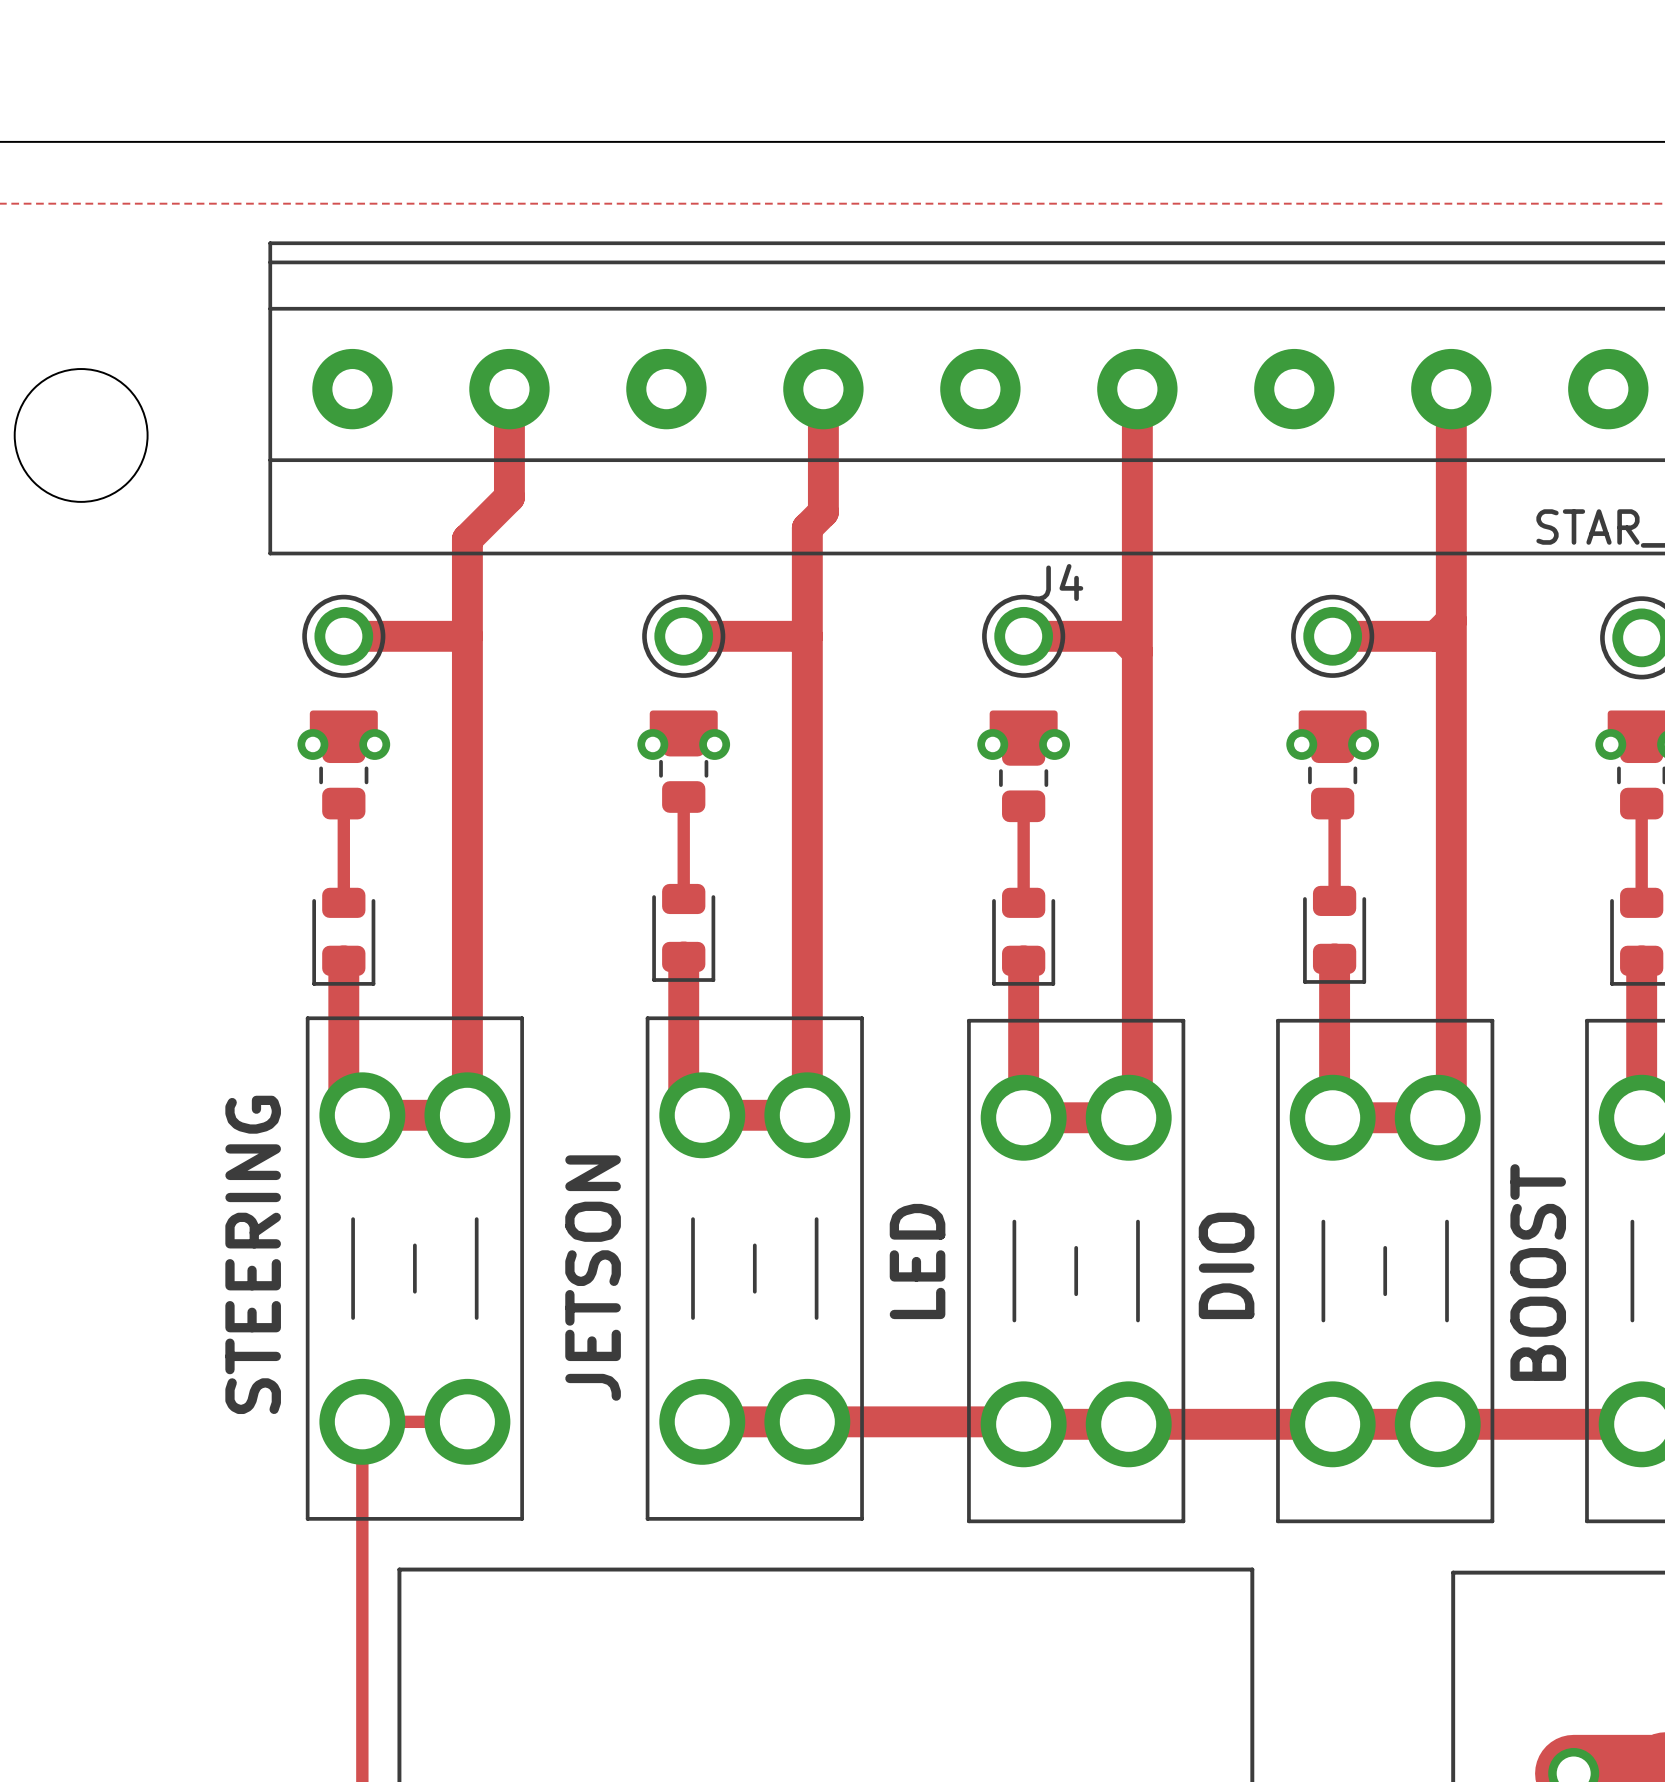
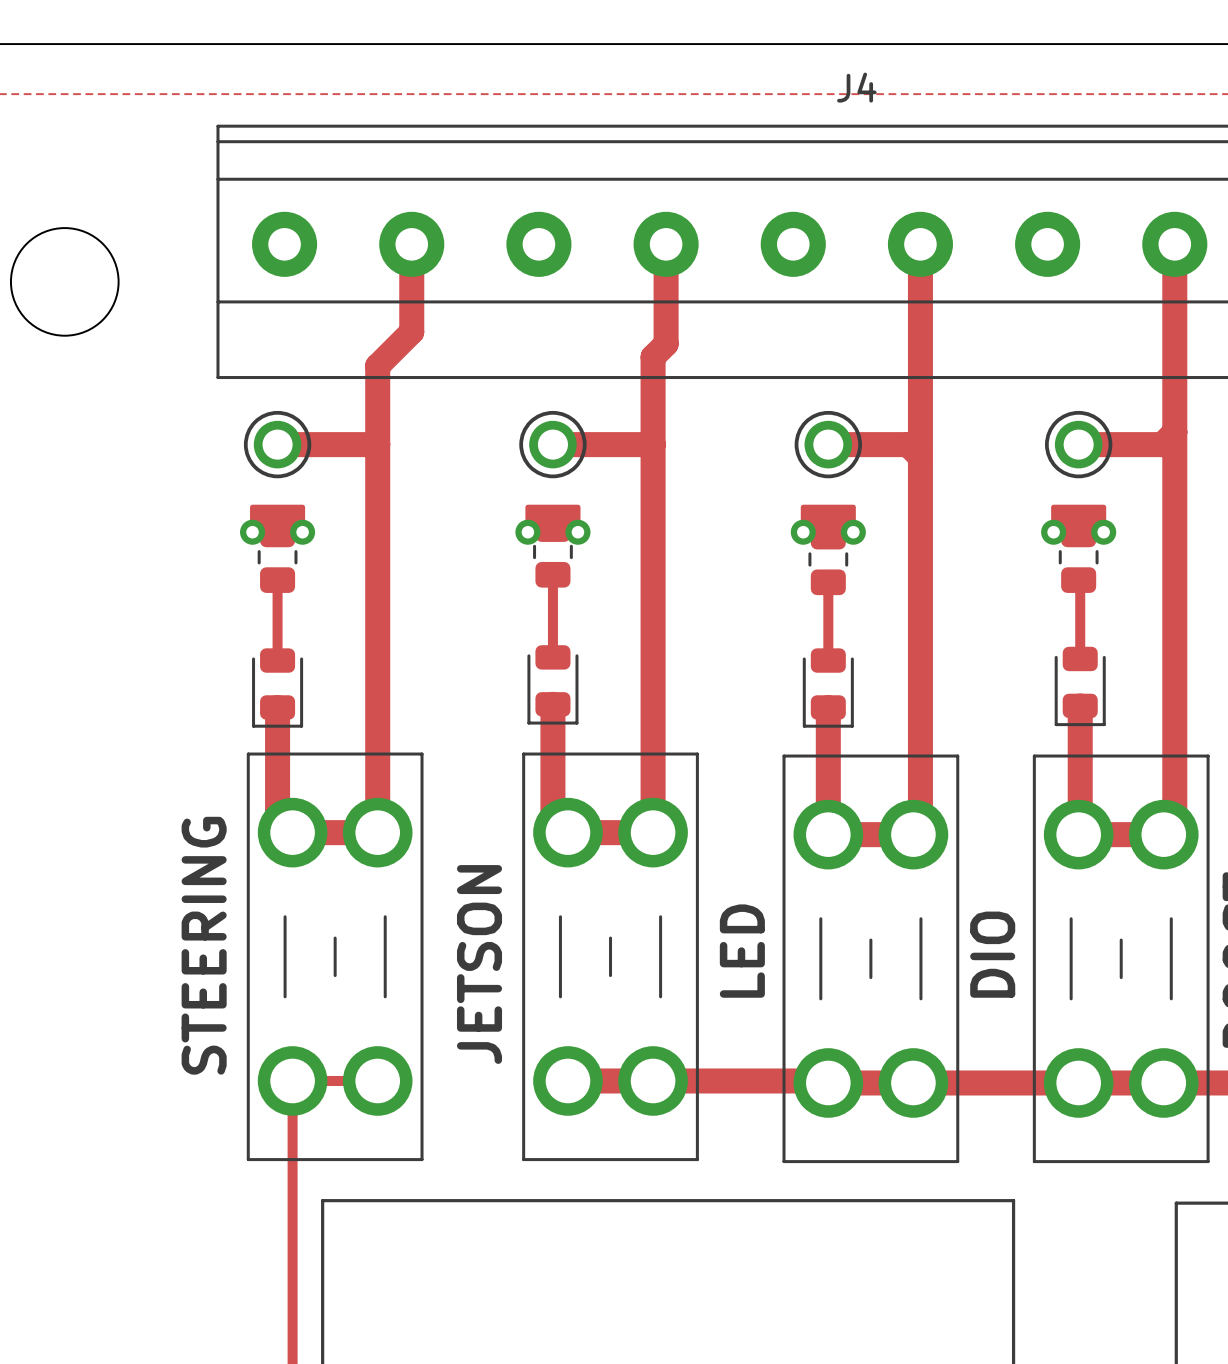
J4 name position: J4 (1058, 582) -> J4 (856, 87)

